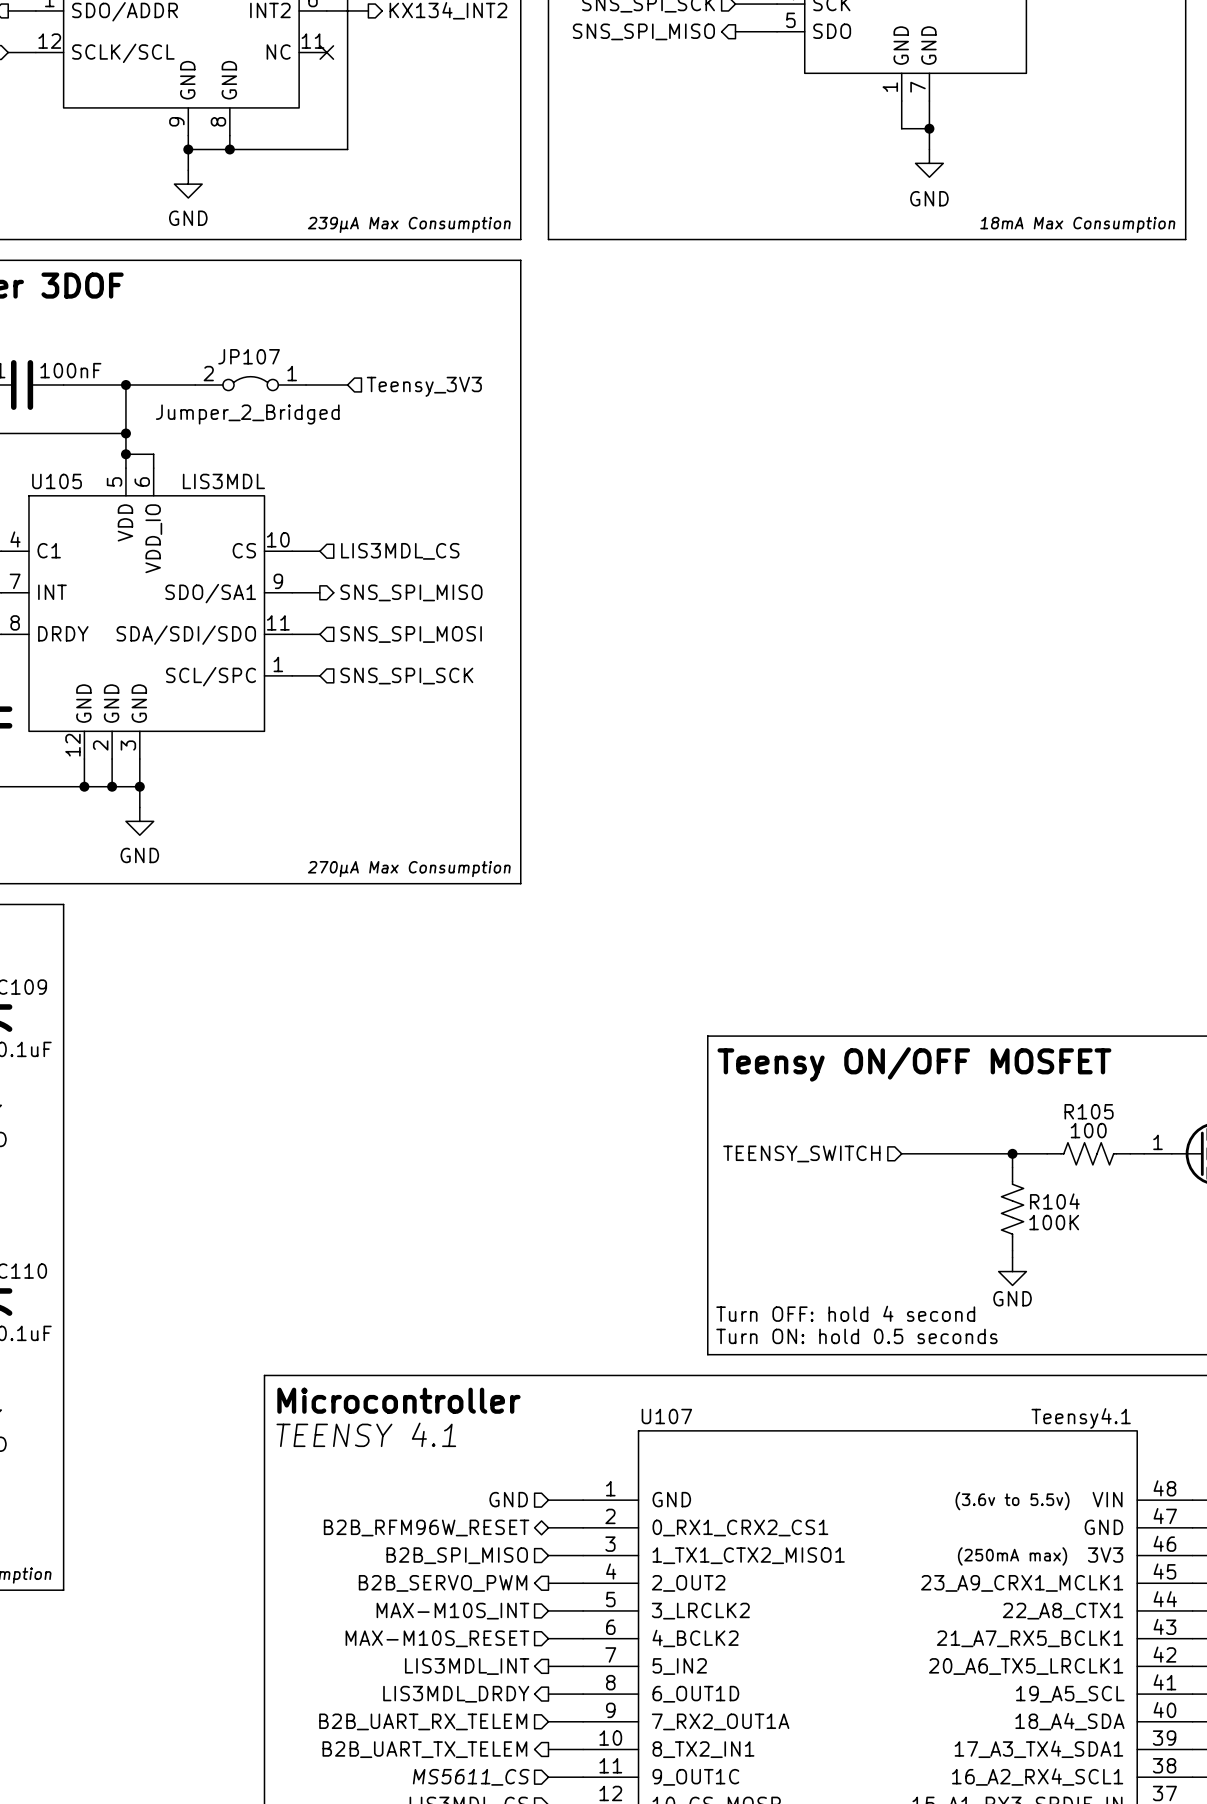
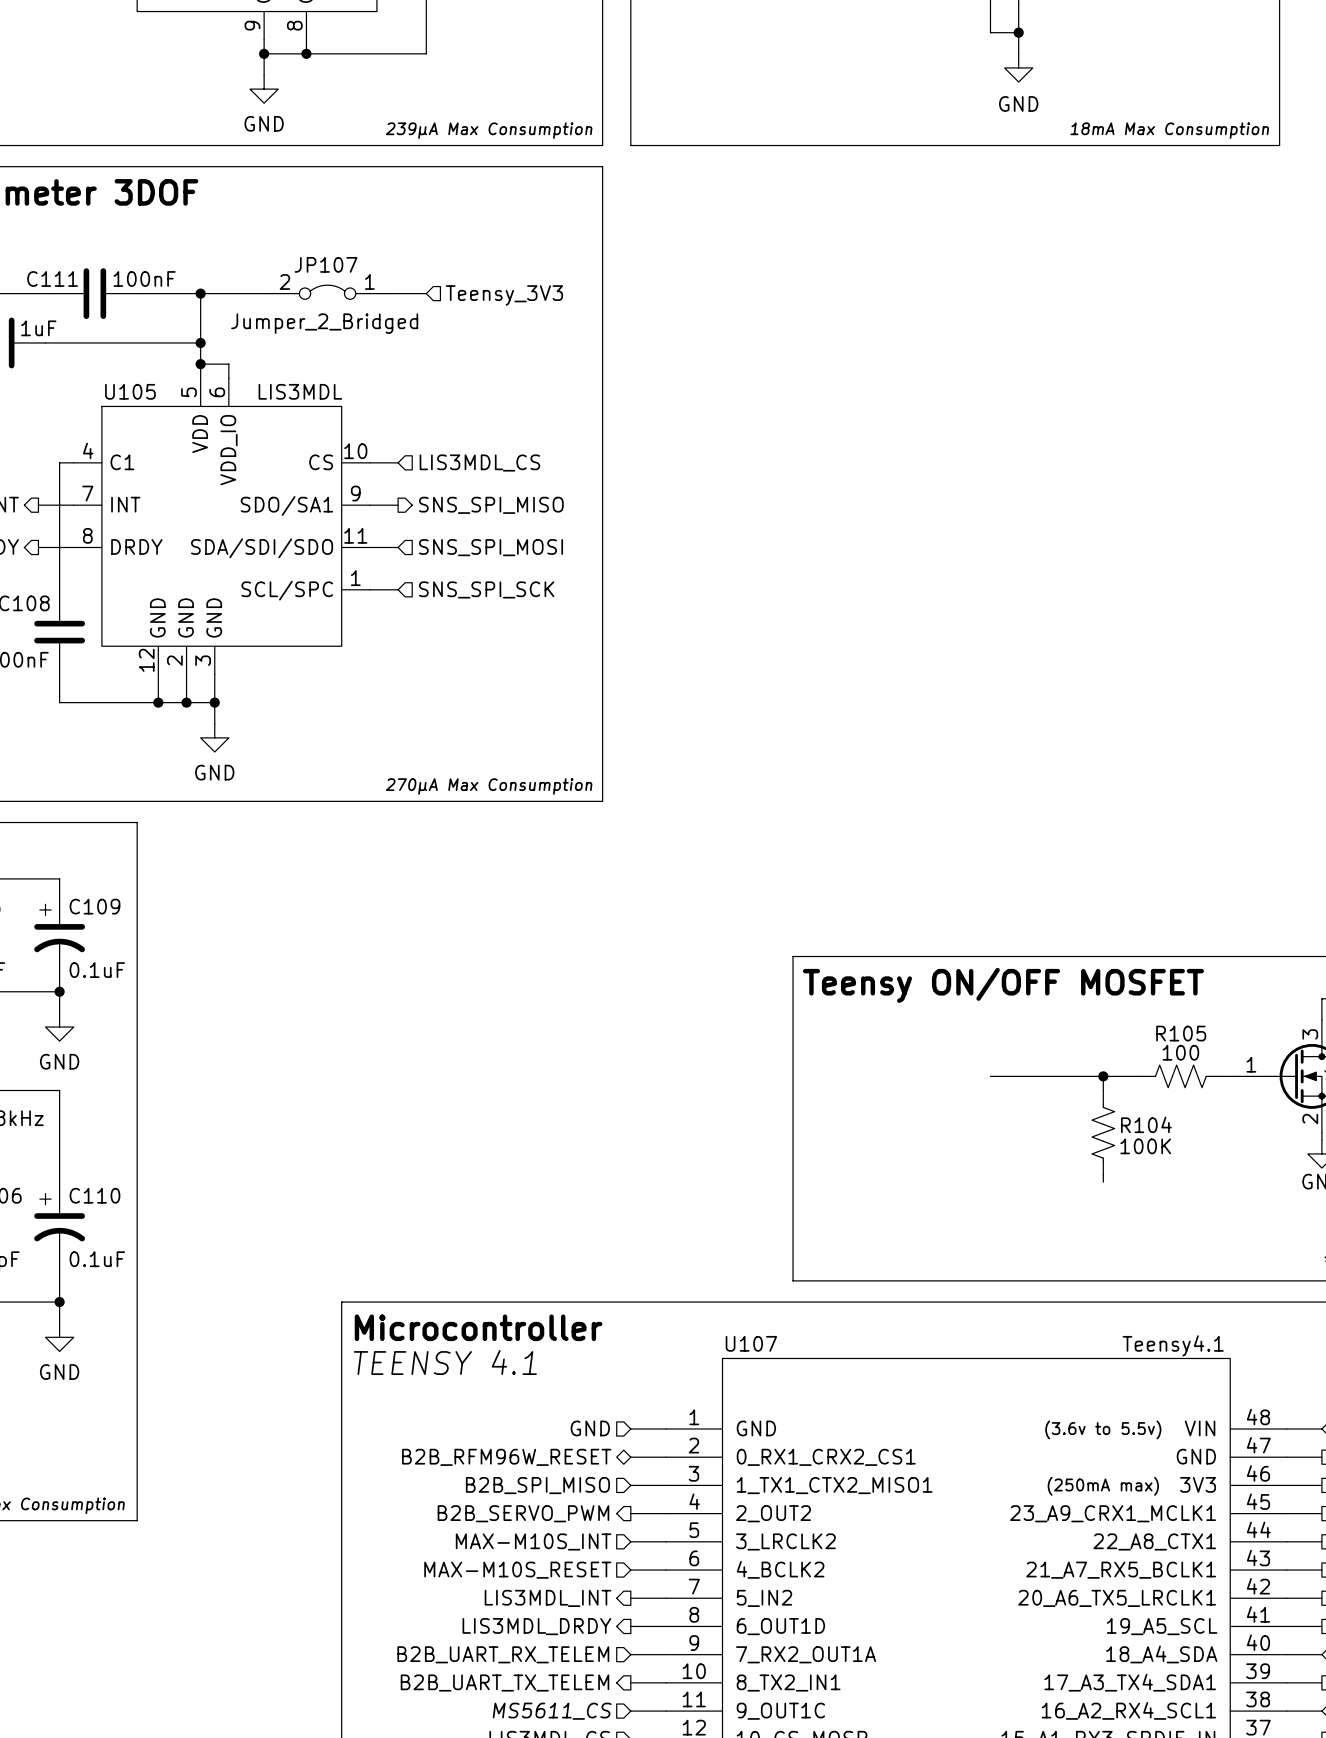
hierarchical label: TEENSY_SWITCH (801, 1153) -> none
power symbol: GND (1012, 1271) -> none
text: Turn OFF: hold 4 second (845, 1313) -> none
text: Turn ON: hold 0.5 seconds (856, 1336) -> none

